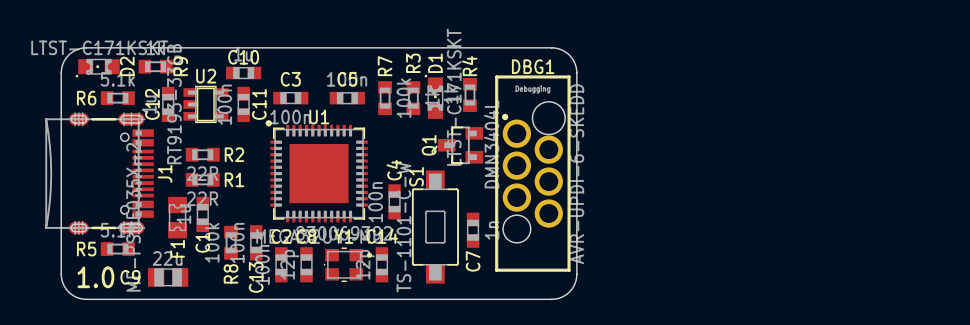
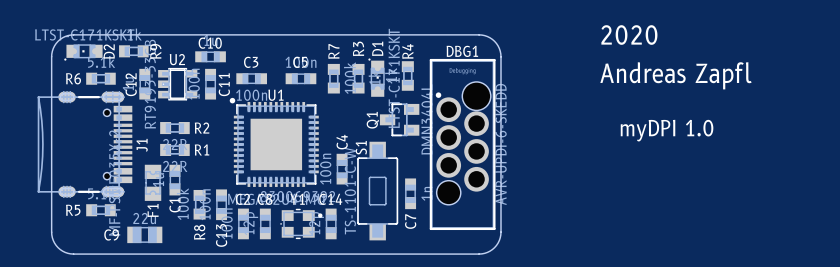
text: none -> 2020 (629, 35)
text: none -> Andreas Zapfl (675, 75)
text: none -> myDPI 1.0 (667, 130)
text: 1.0 (95, 277) -> none

